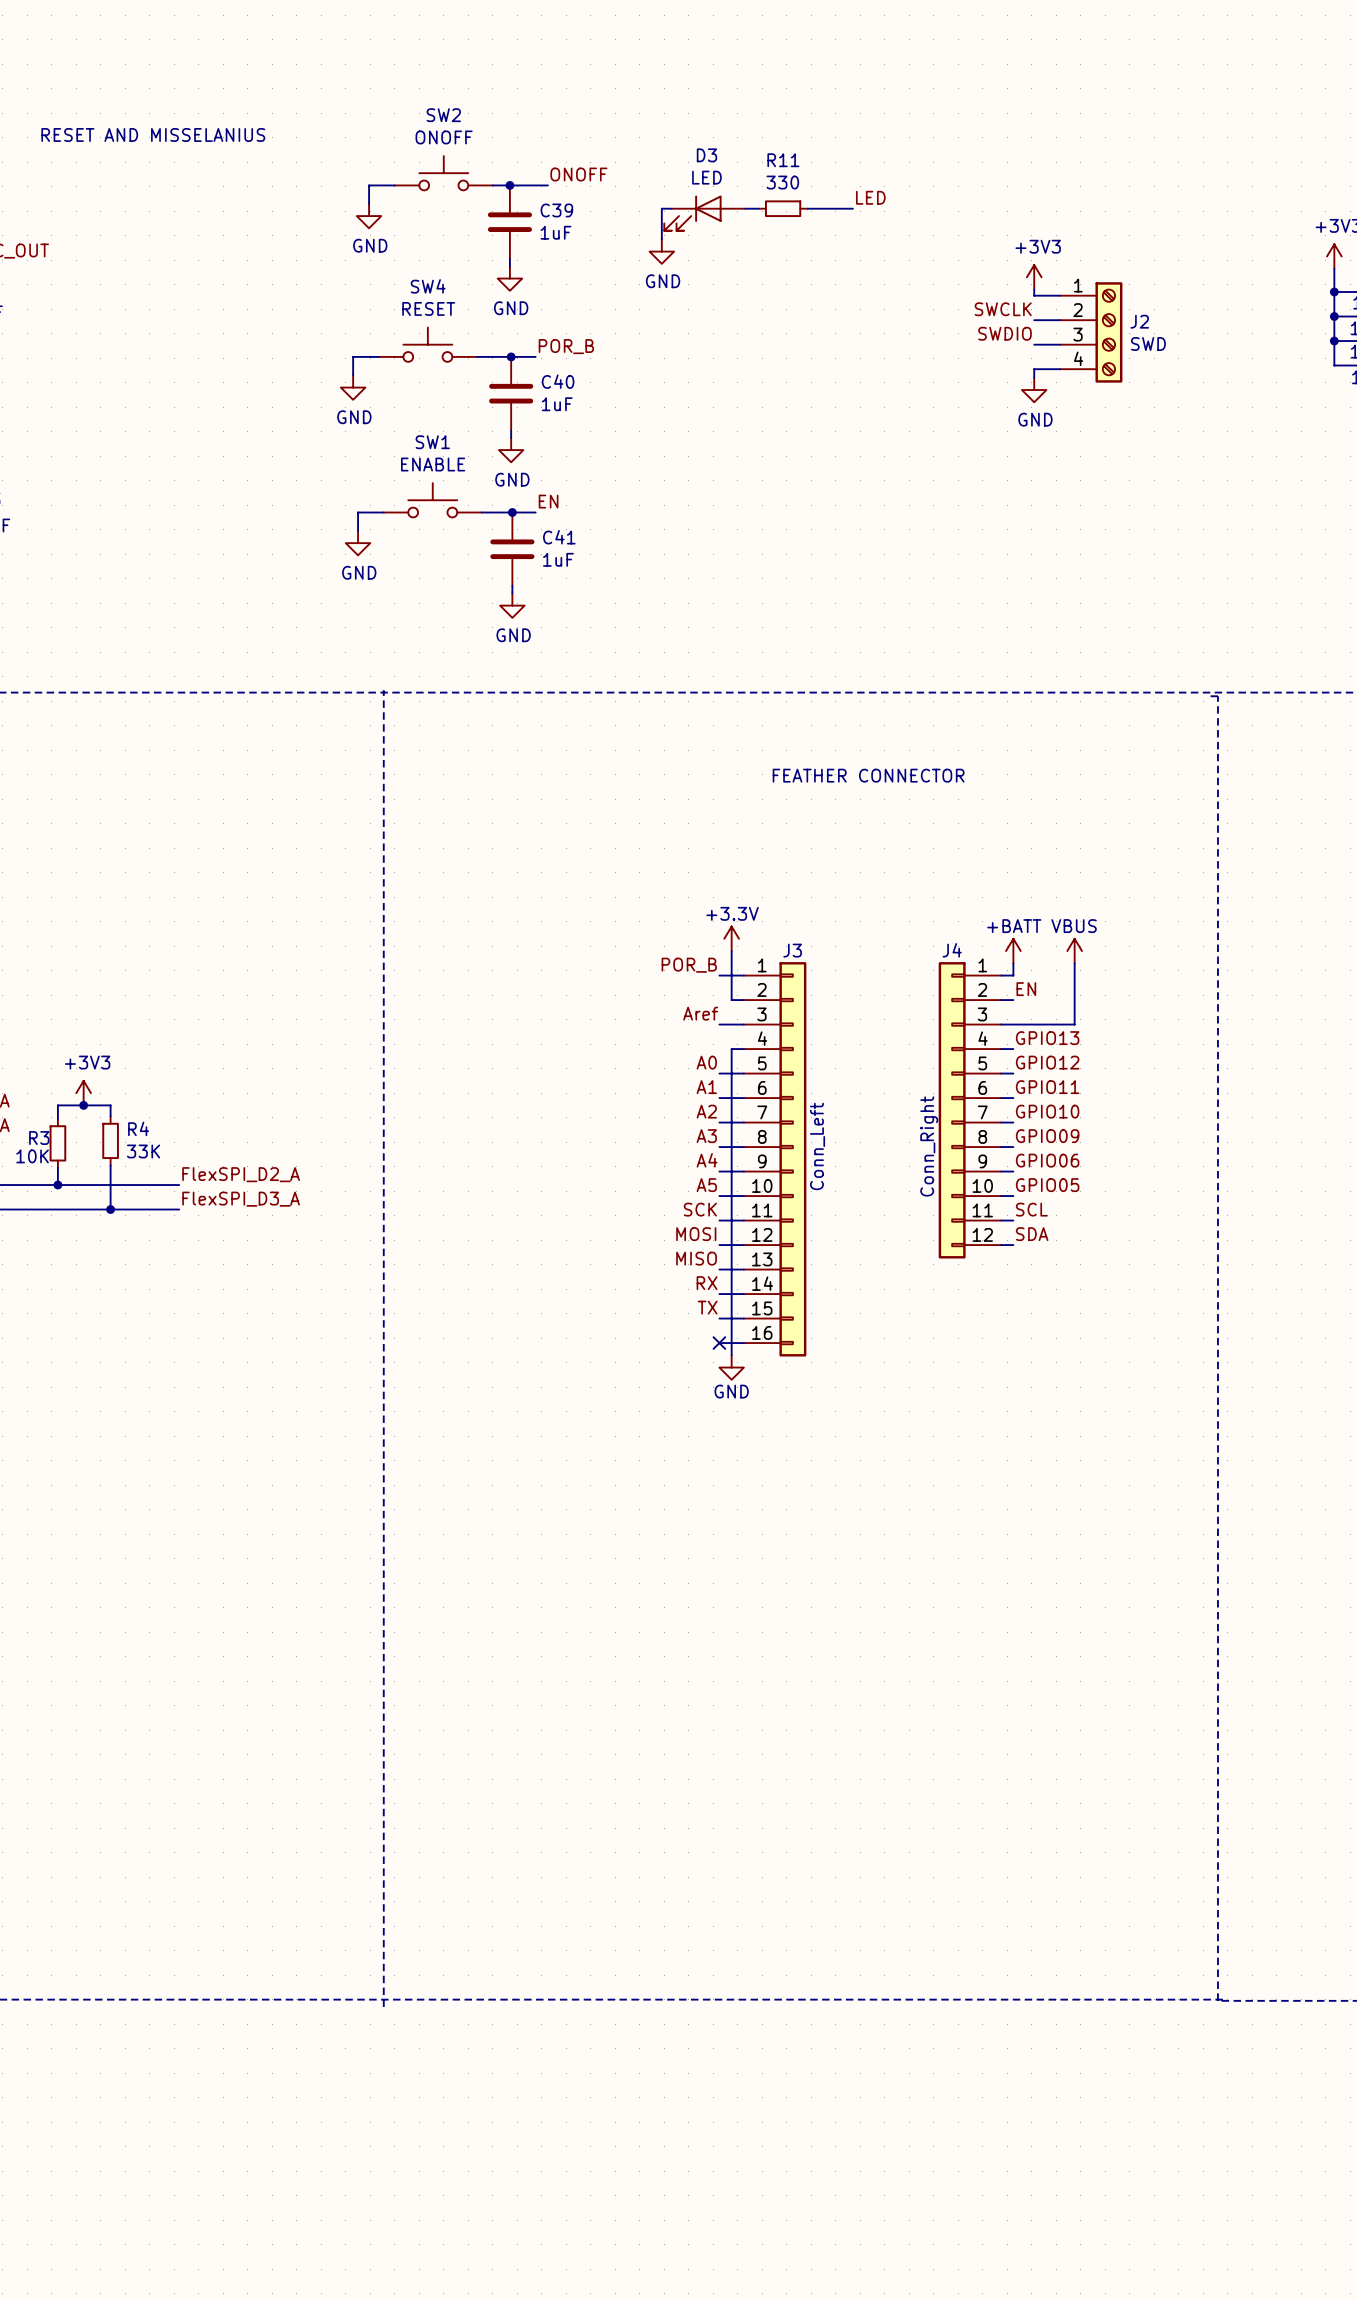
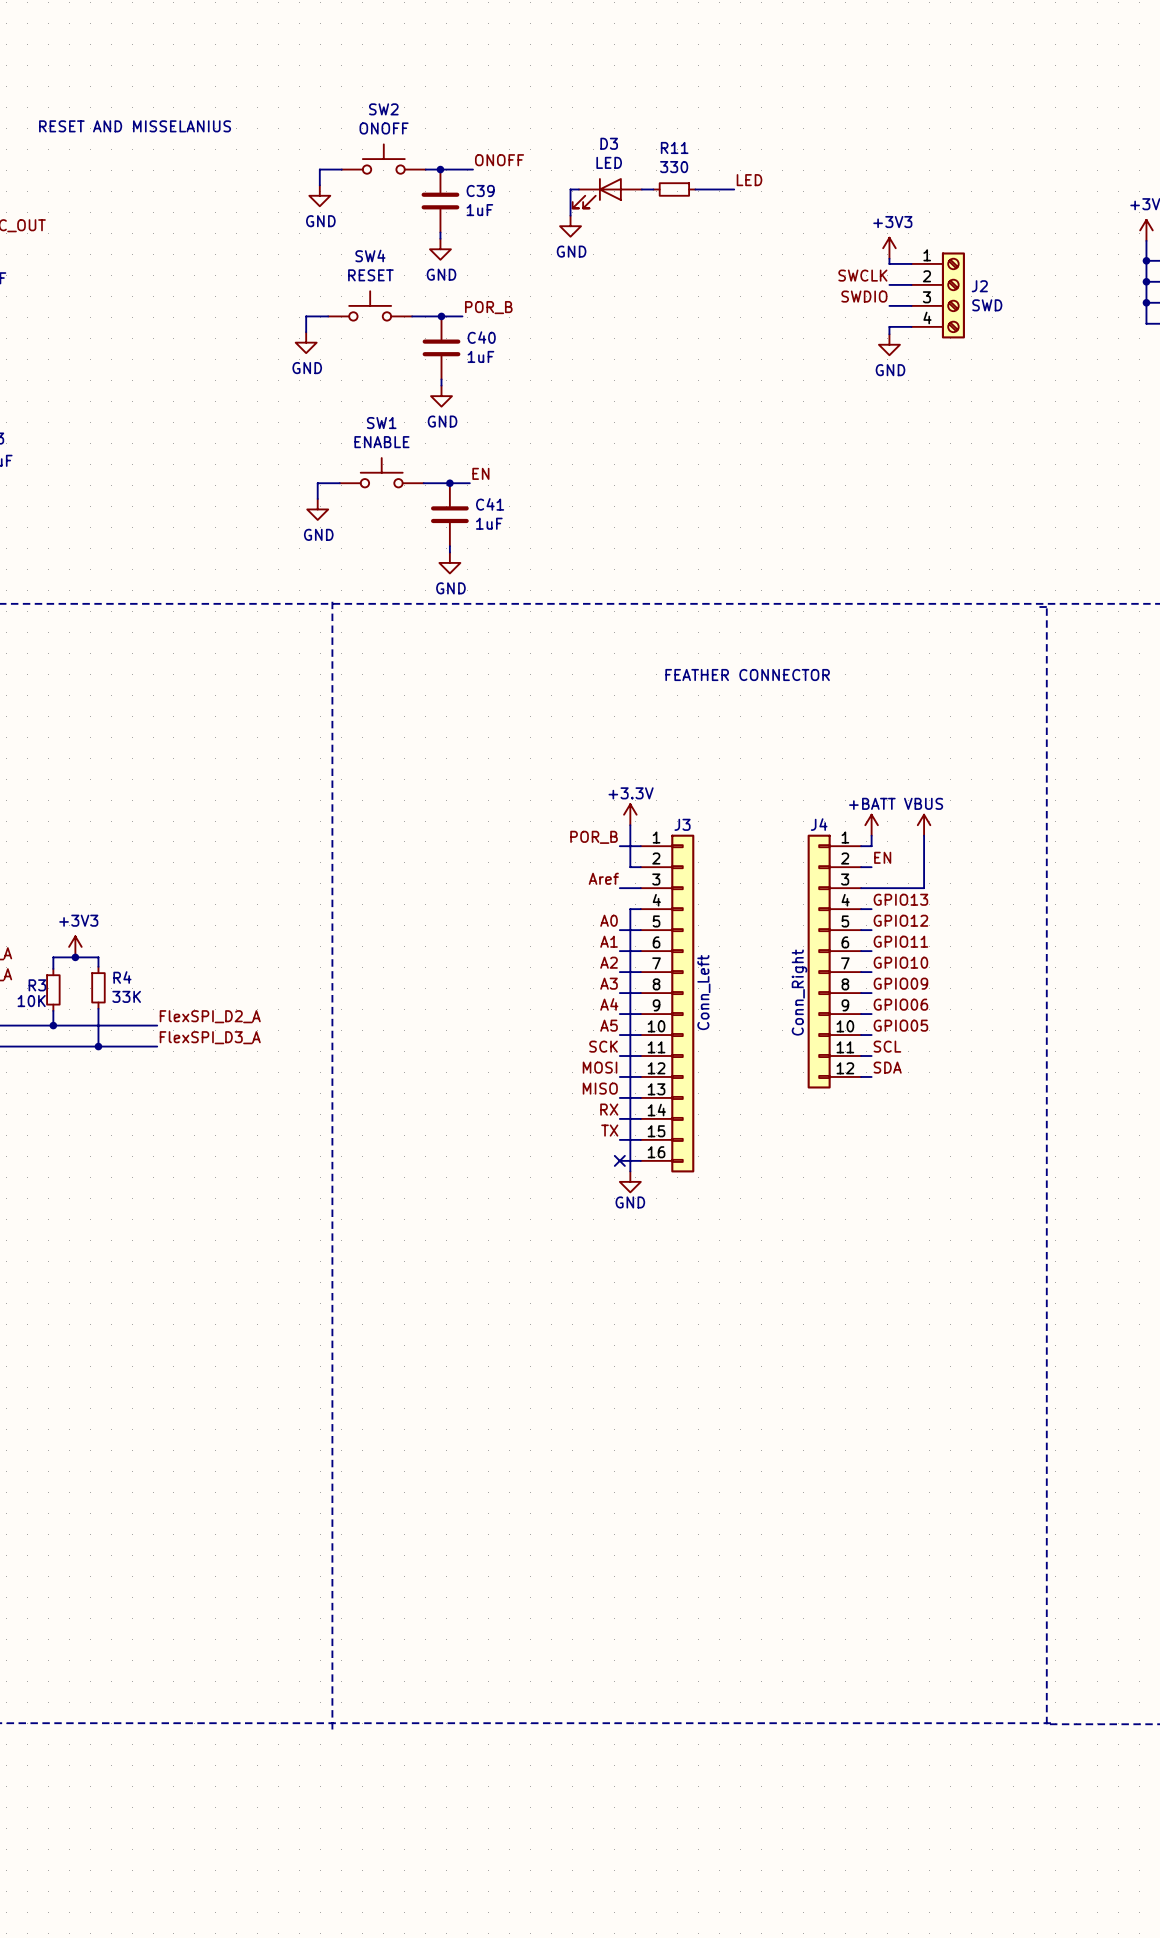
SW1 position: (432, 500) -> (381, 472)
label position: EN (548, 501) -> EN (480, 473)
wire: (383, 512) (358, 512) (358, 530) -> (339, 483) (317, 483) (317, 498)
wire: (481, 512) (535, 512) -> (423, 483) (469, 483)
junction position: (512, 512) -> (449, 483)
power symbol position: GND (358, 543) -> GND (317, 509)
C41 position: (512, 549) -> (449, 514)
wire: (512, 586) (512, 593) -> (449, 546) (449, 552)
power symbol position: GND (512, 605) -> GND (449, 562)

